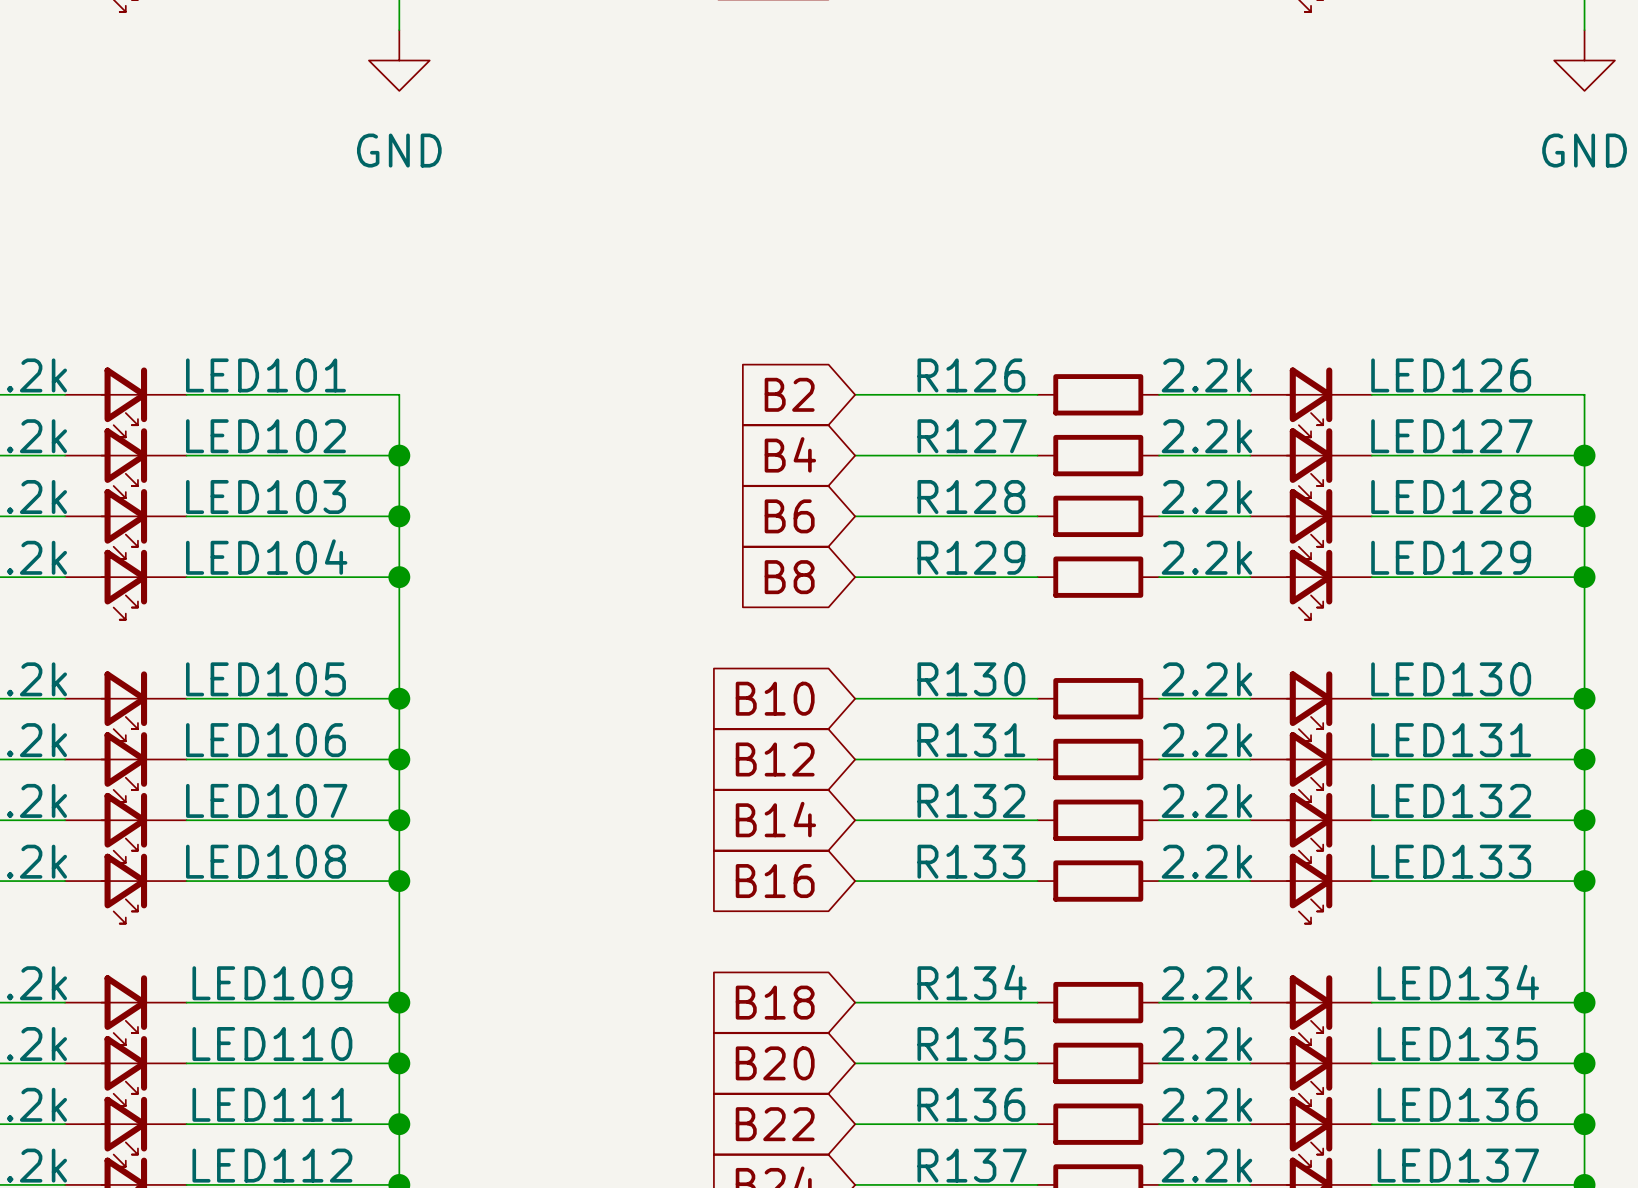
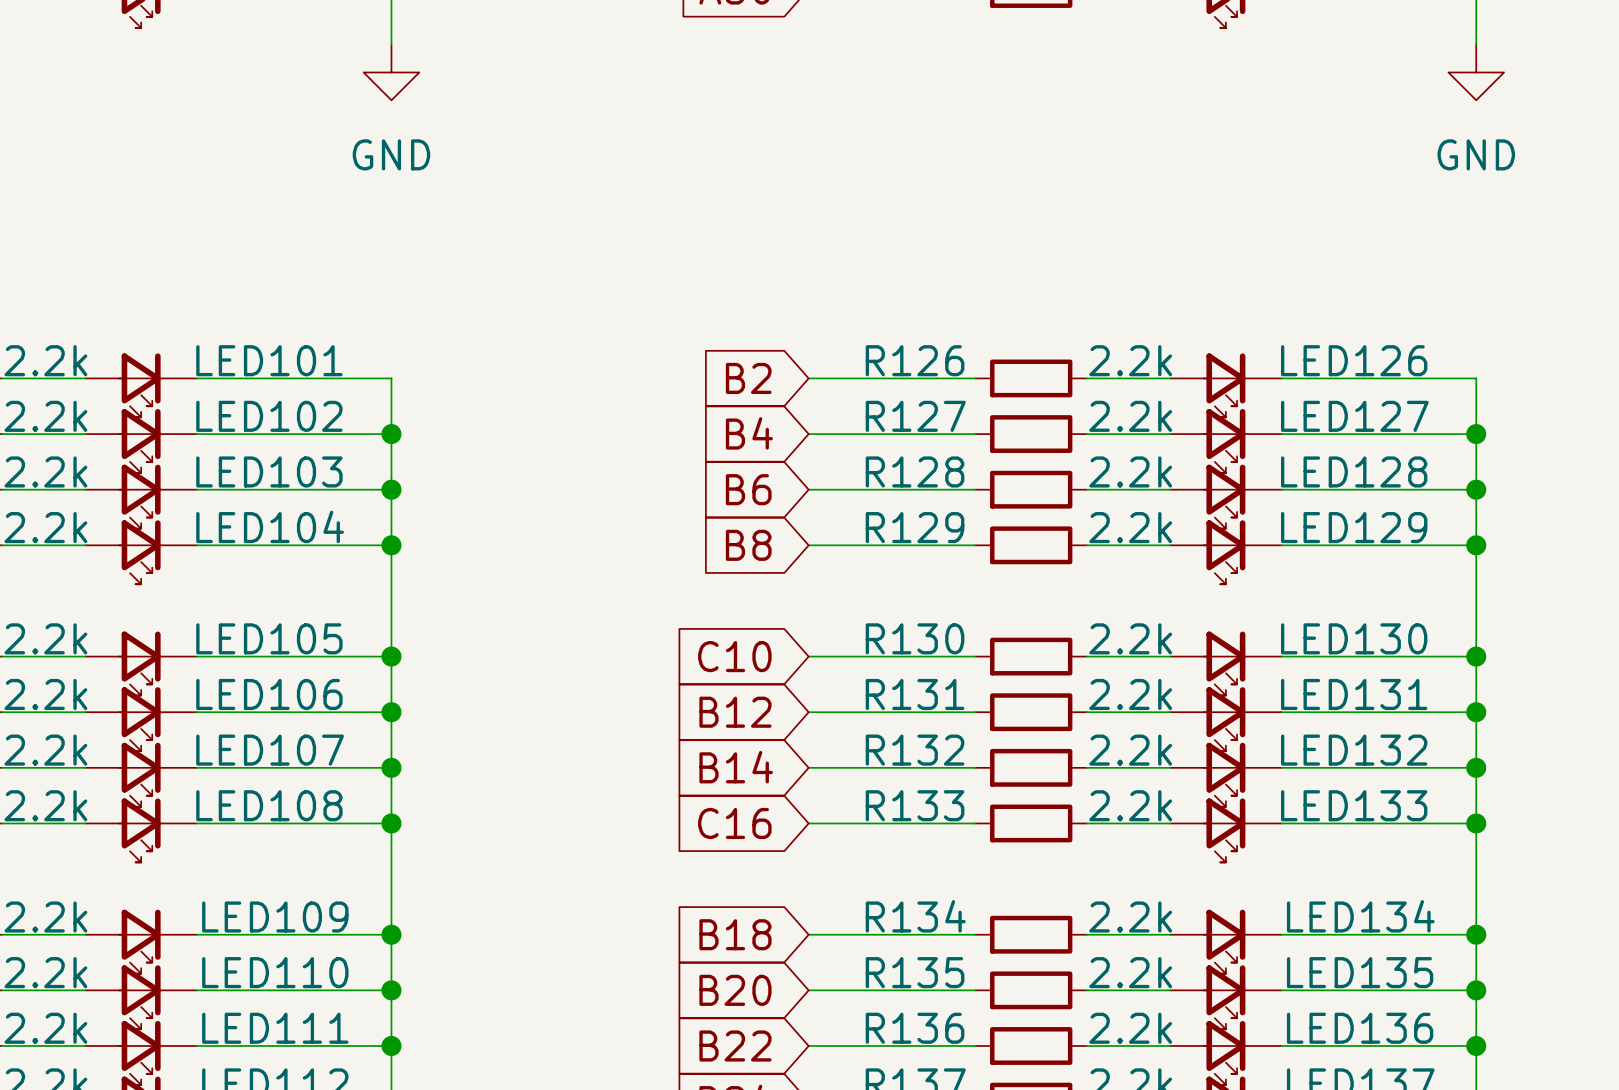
global label: B10 (775, 698) -> C10 (734, 656)
global label: B16 (775, 881) -> C16 (734, 823)

